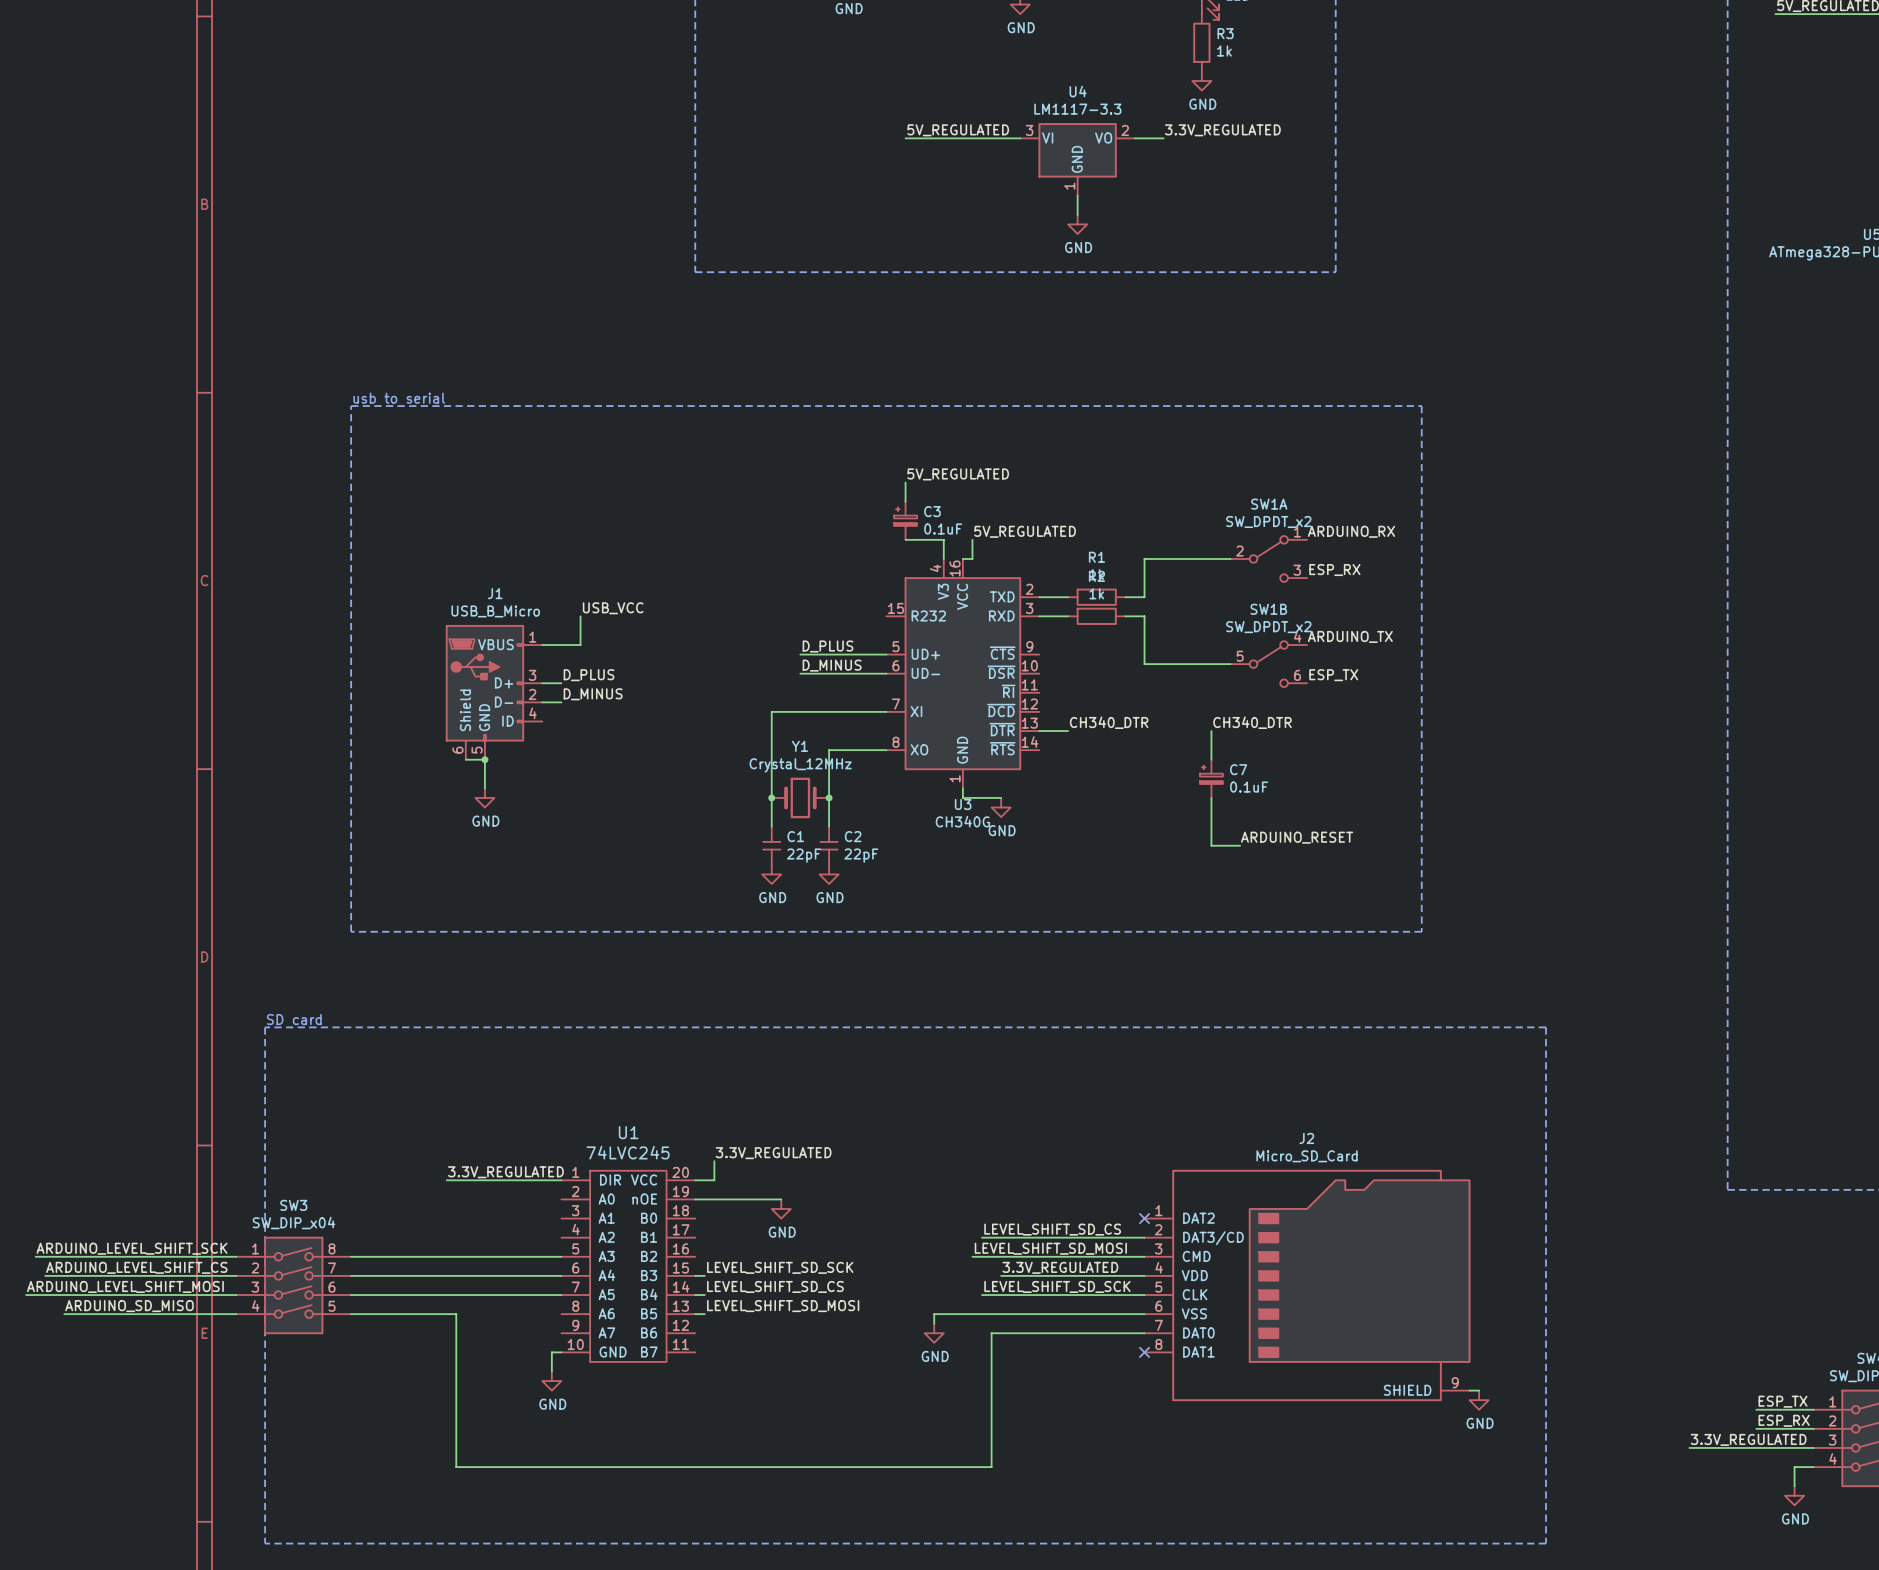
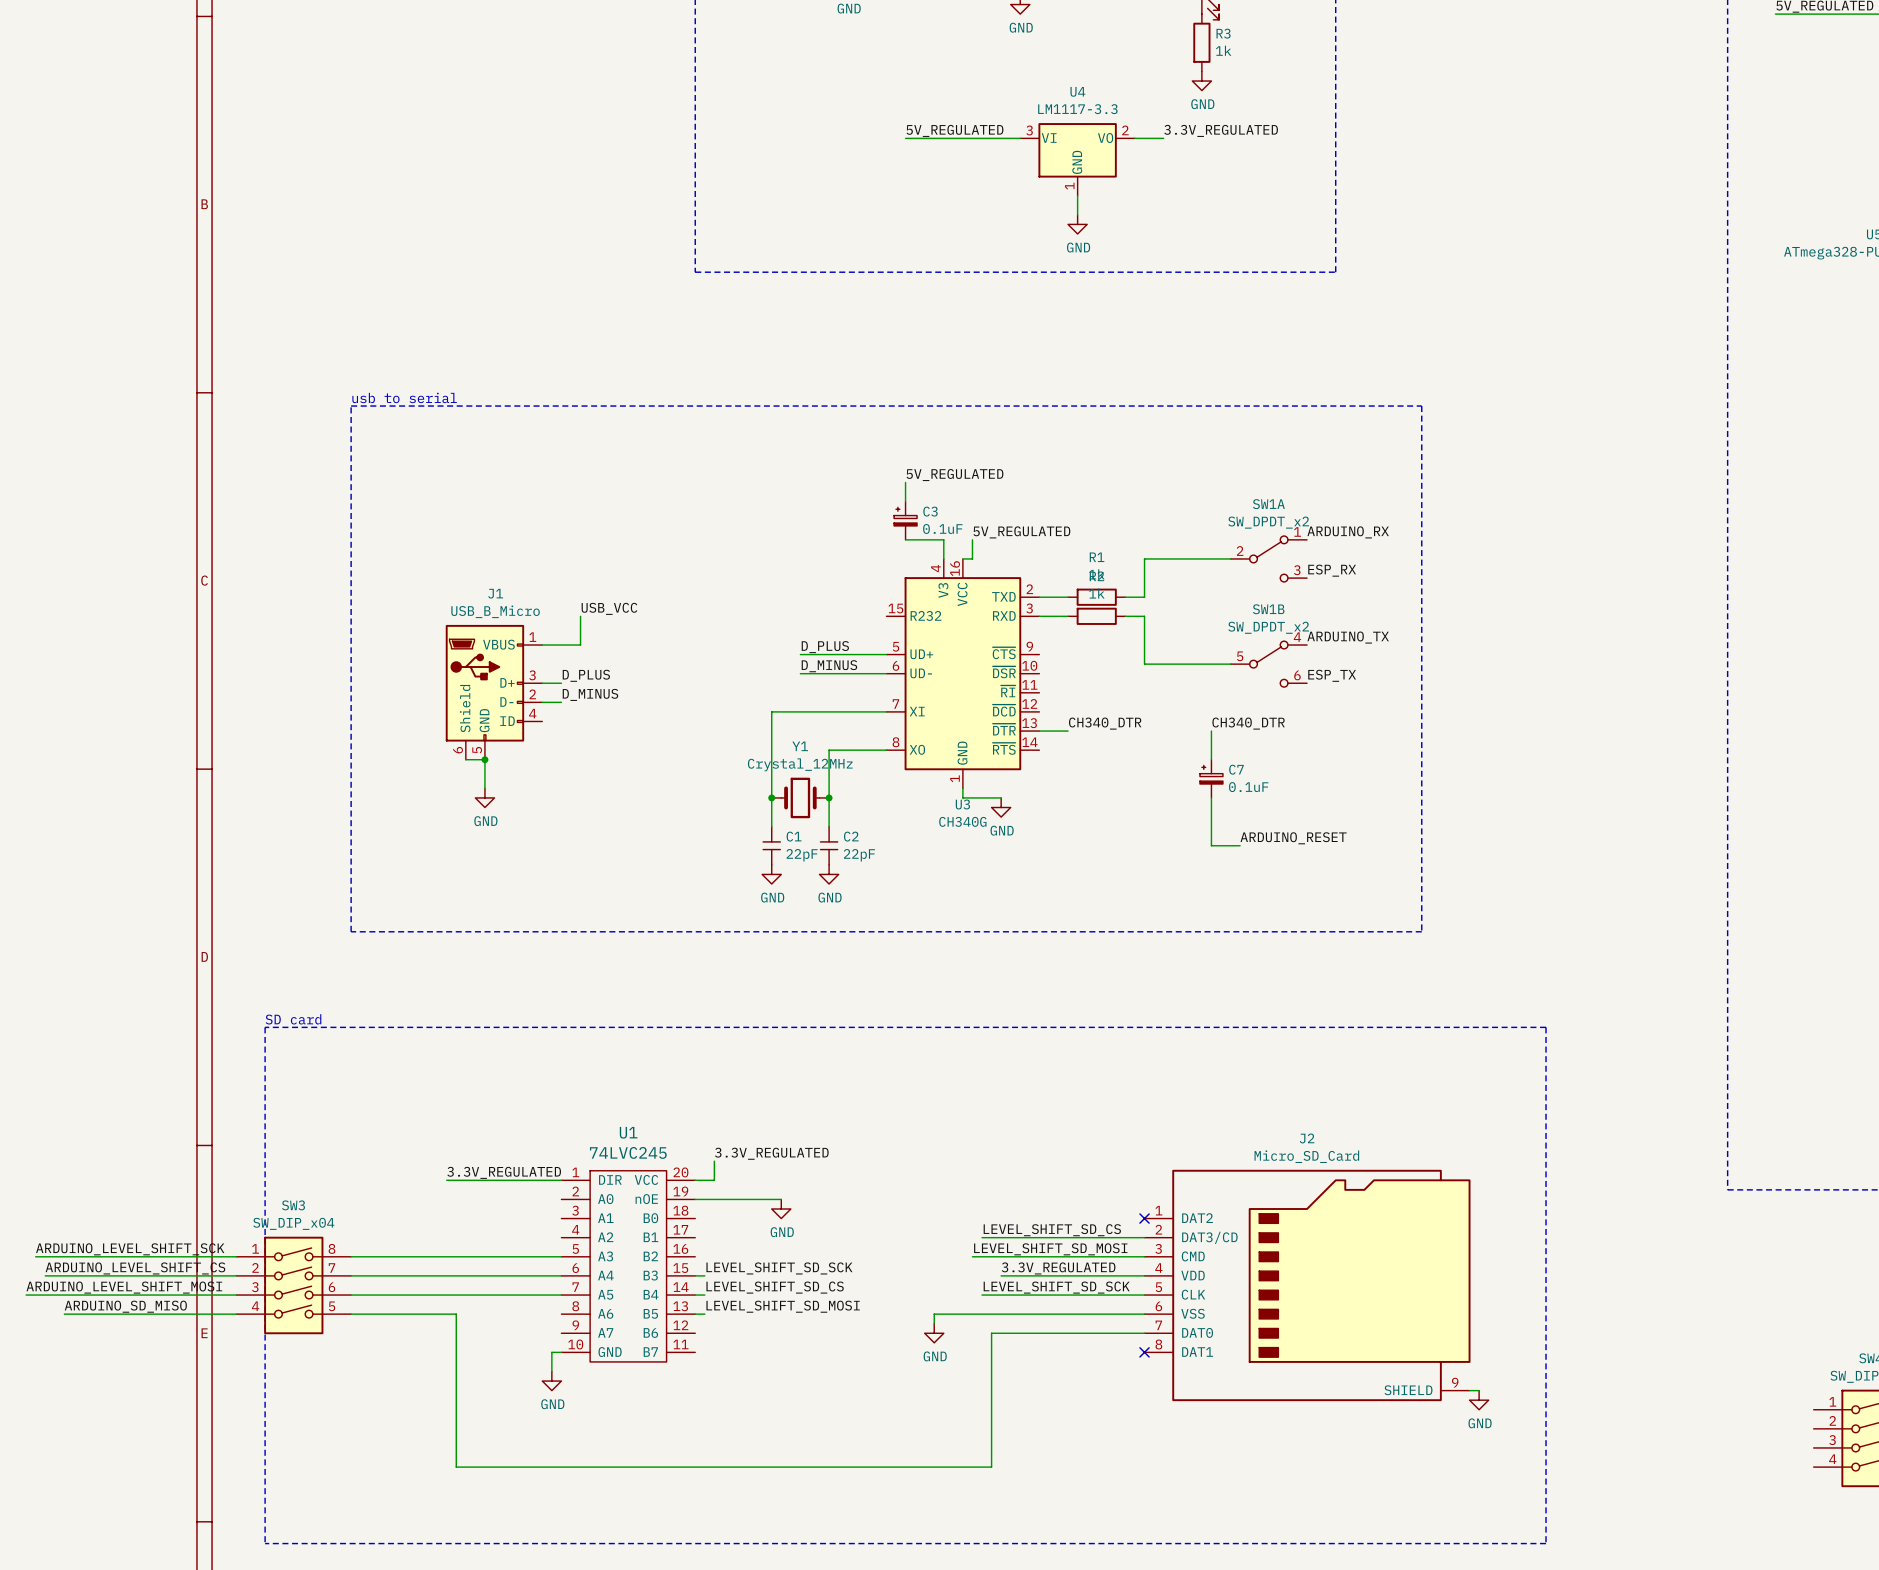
label: ESP_TX (1783, 1401) -> none
wire: (1756, 1409) (1813, 1409) -> none
label: ESP_RX (1784, 1420) -> none
wire: (1756, 1428) (1813, 1428) -> none
label: 3.3V_REGULATED (1748, 1439) -> none
wire: (1689, 1447) (1813, 1447) -> none
wire: (1813, 1467) (1794, 1467) (1794, 1486) -> none
power symbol: GND (1794, 1495) -> none

